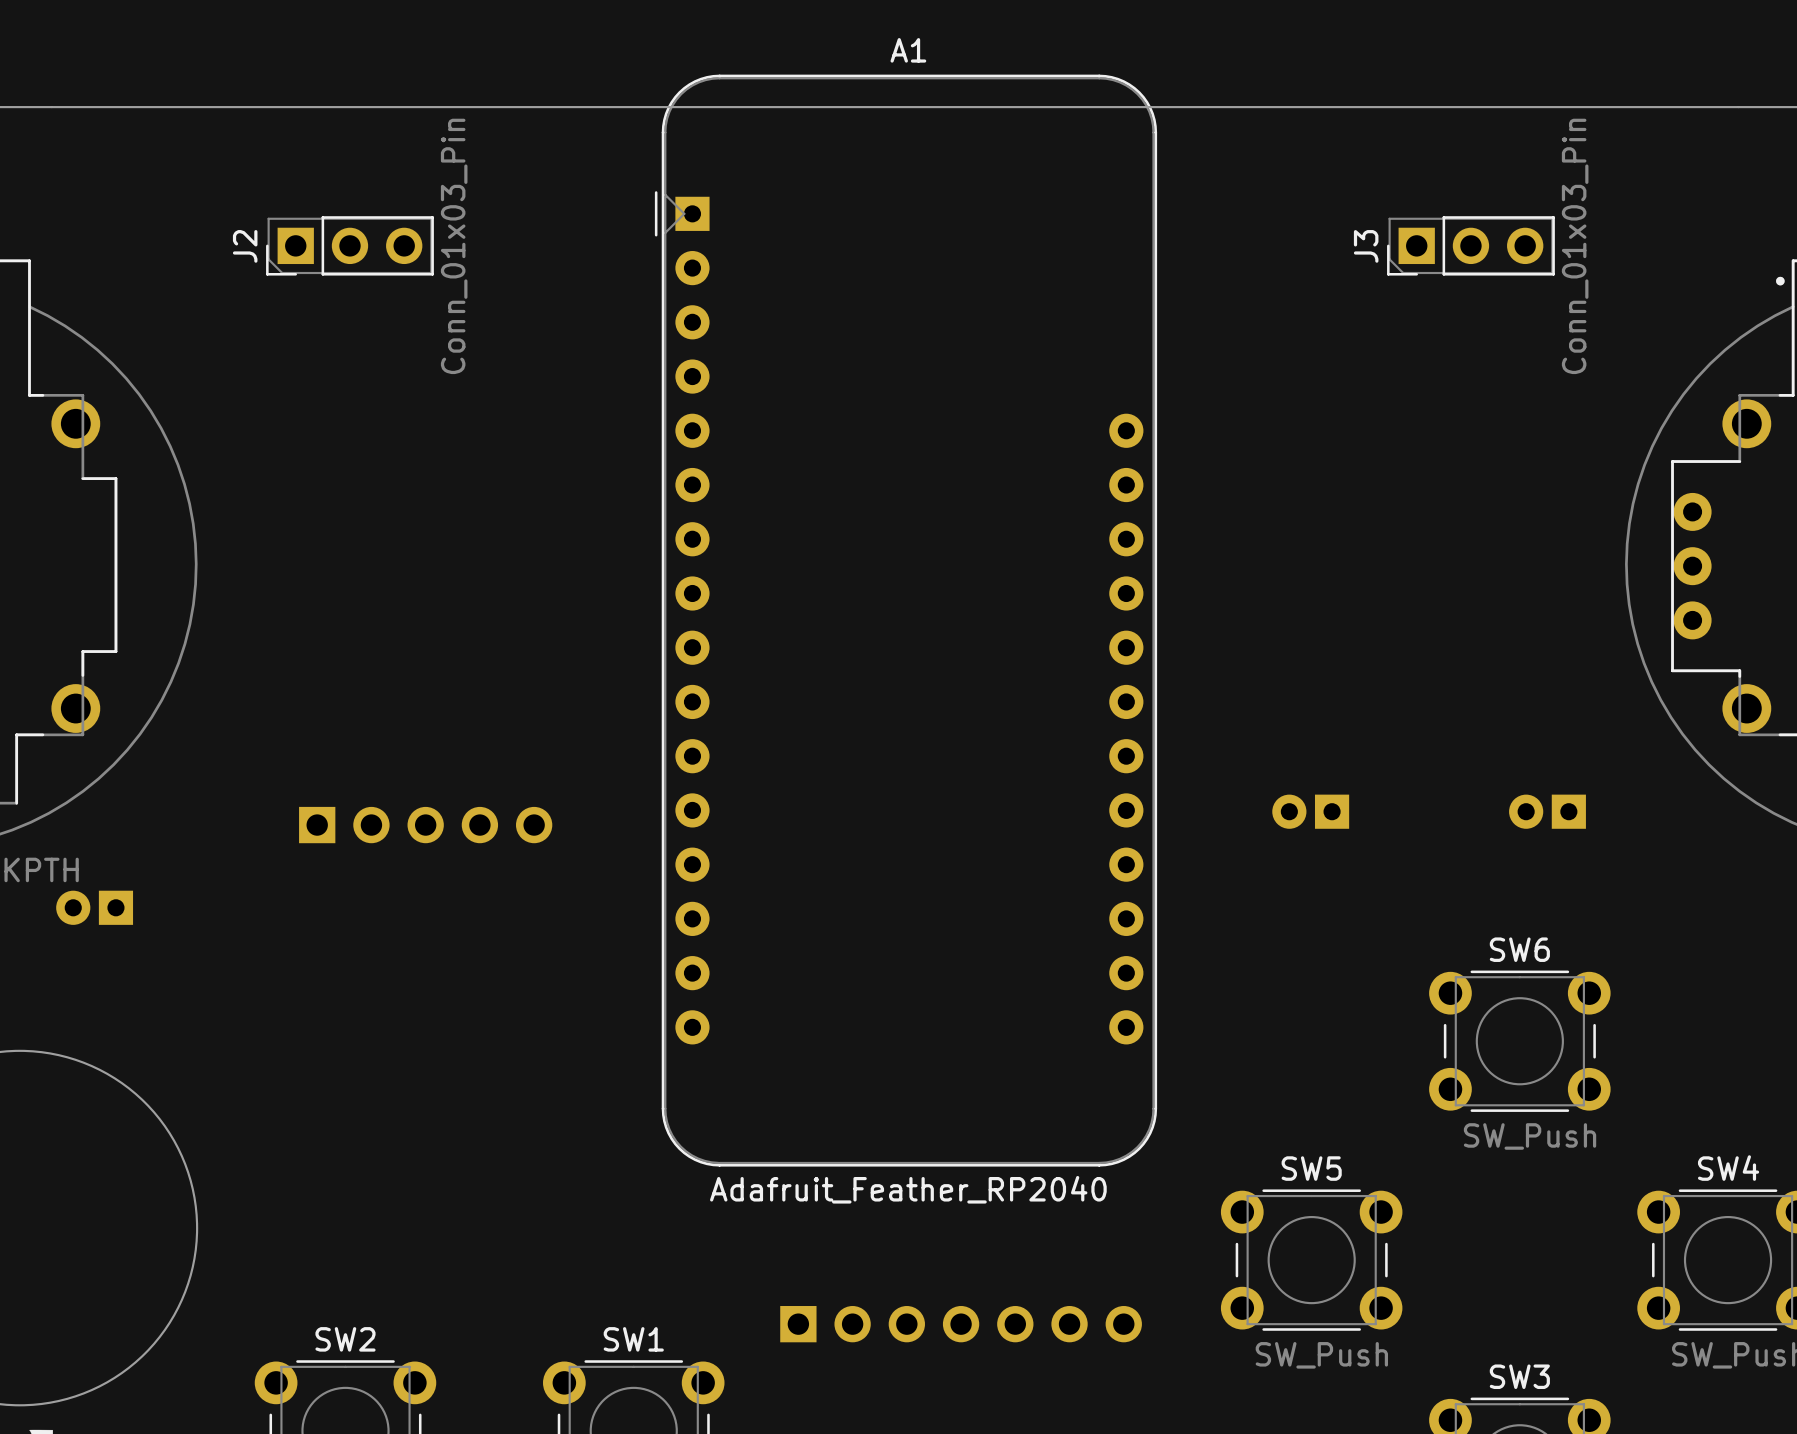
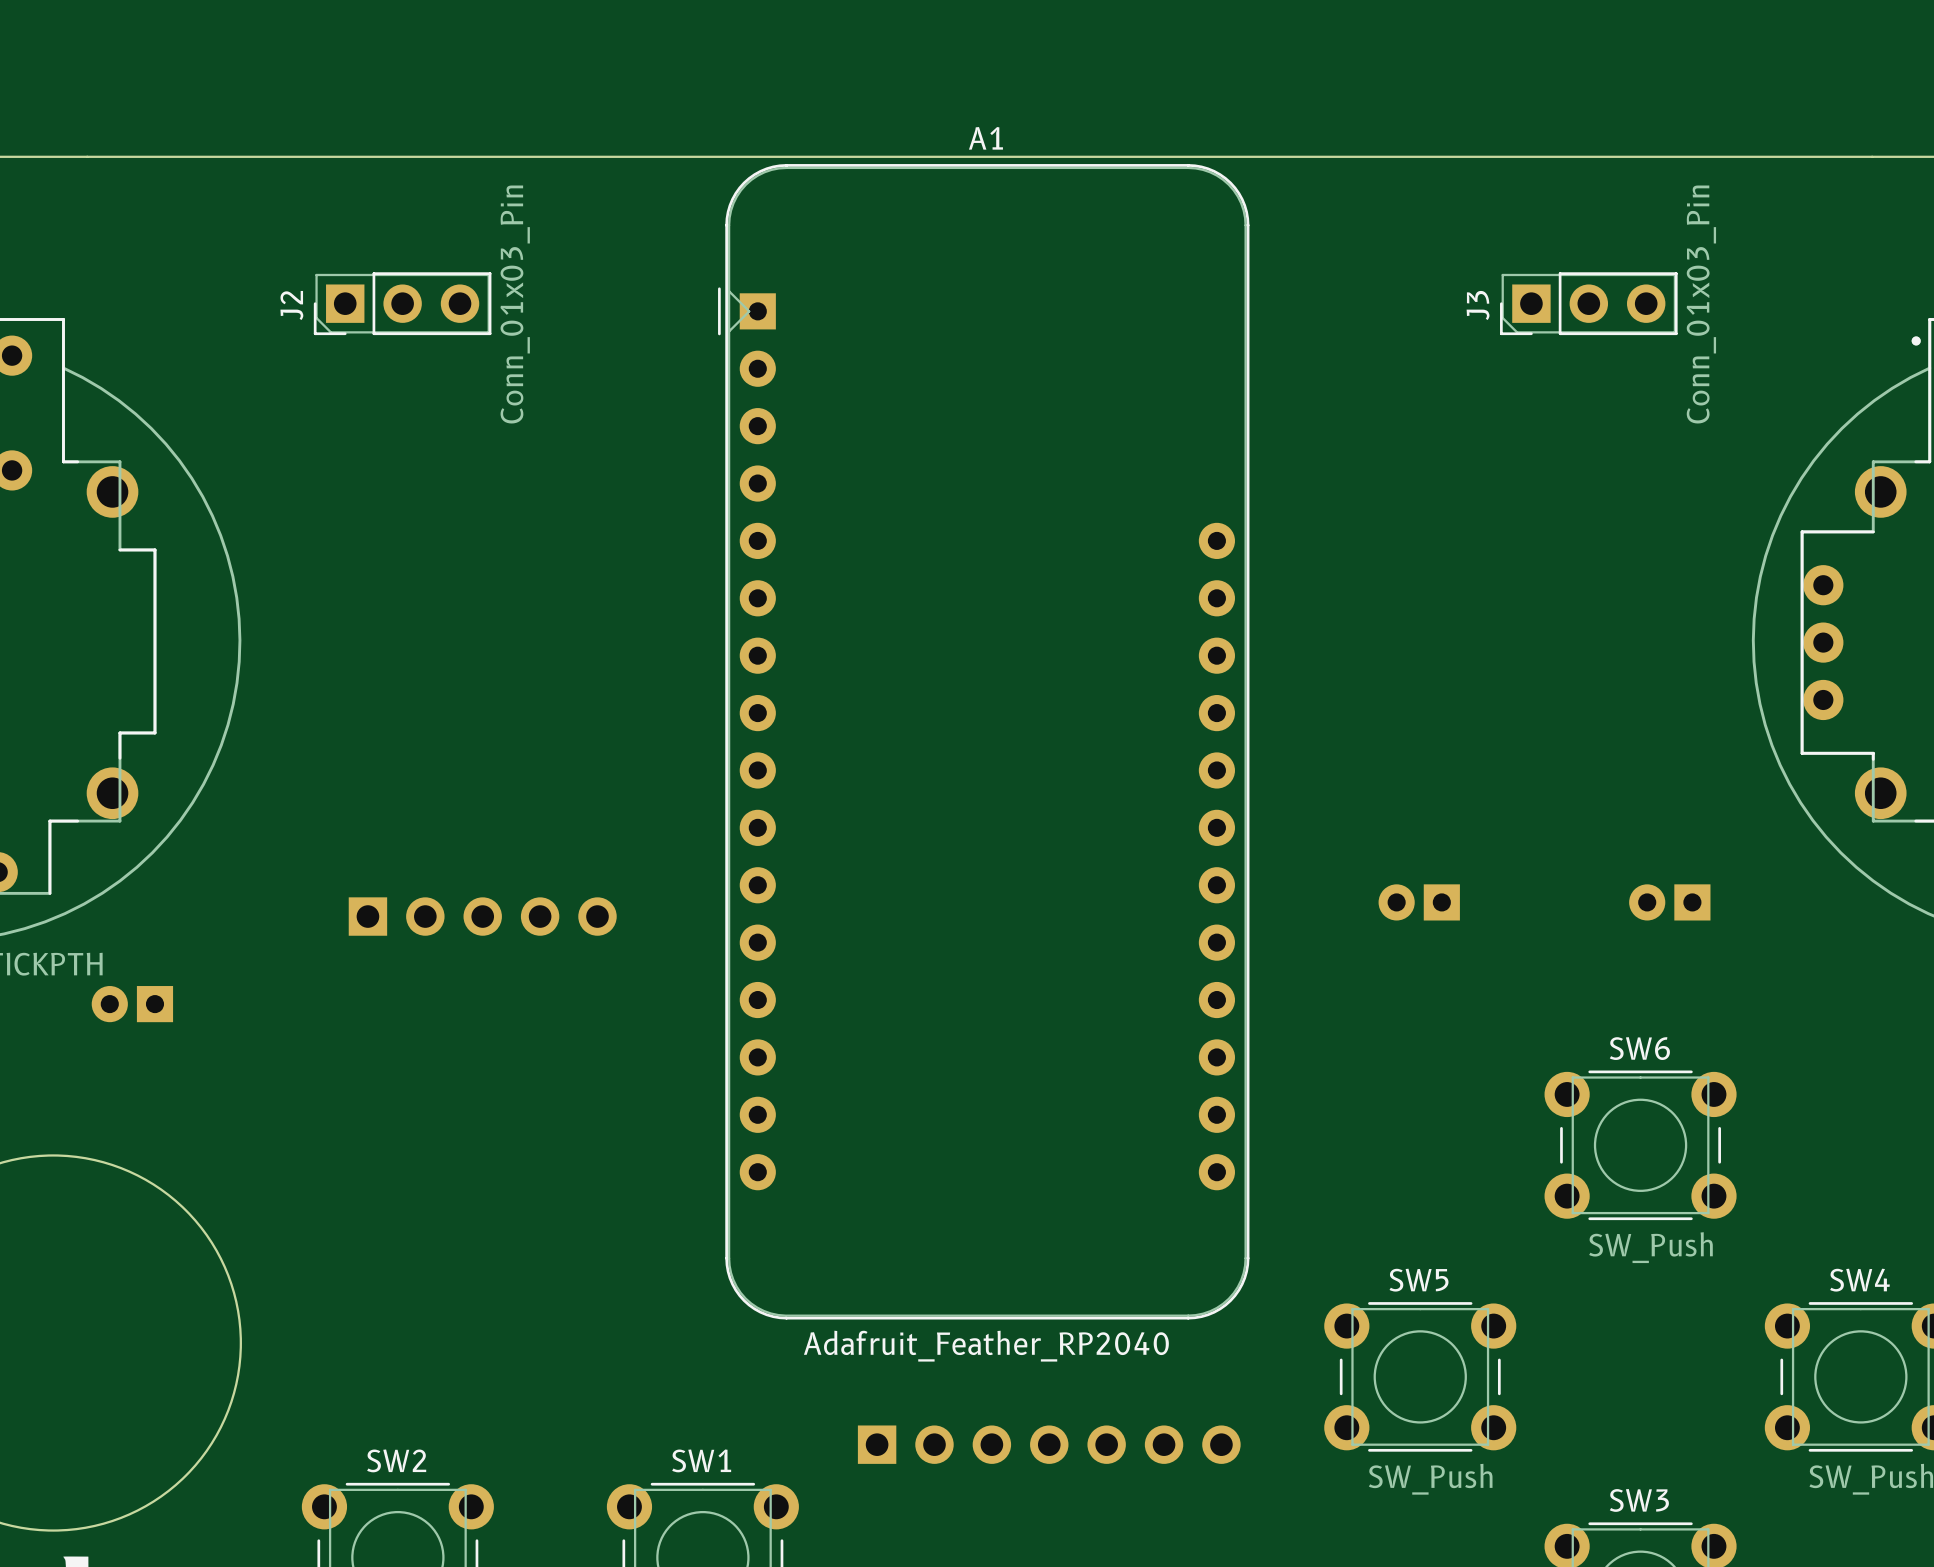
A1 position: (905, 620) -> (983, 741)

